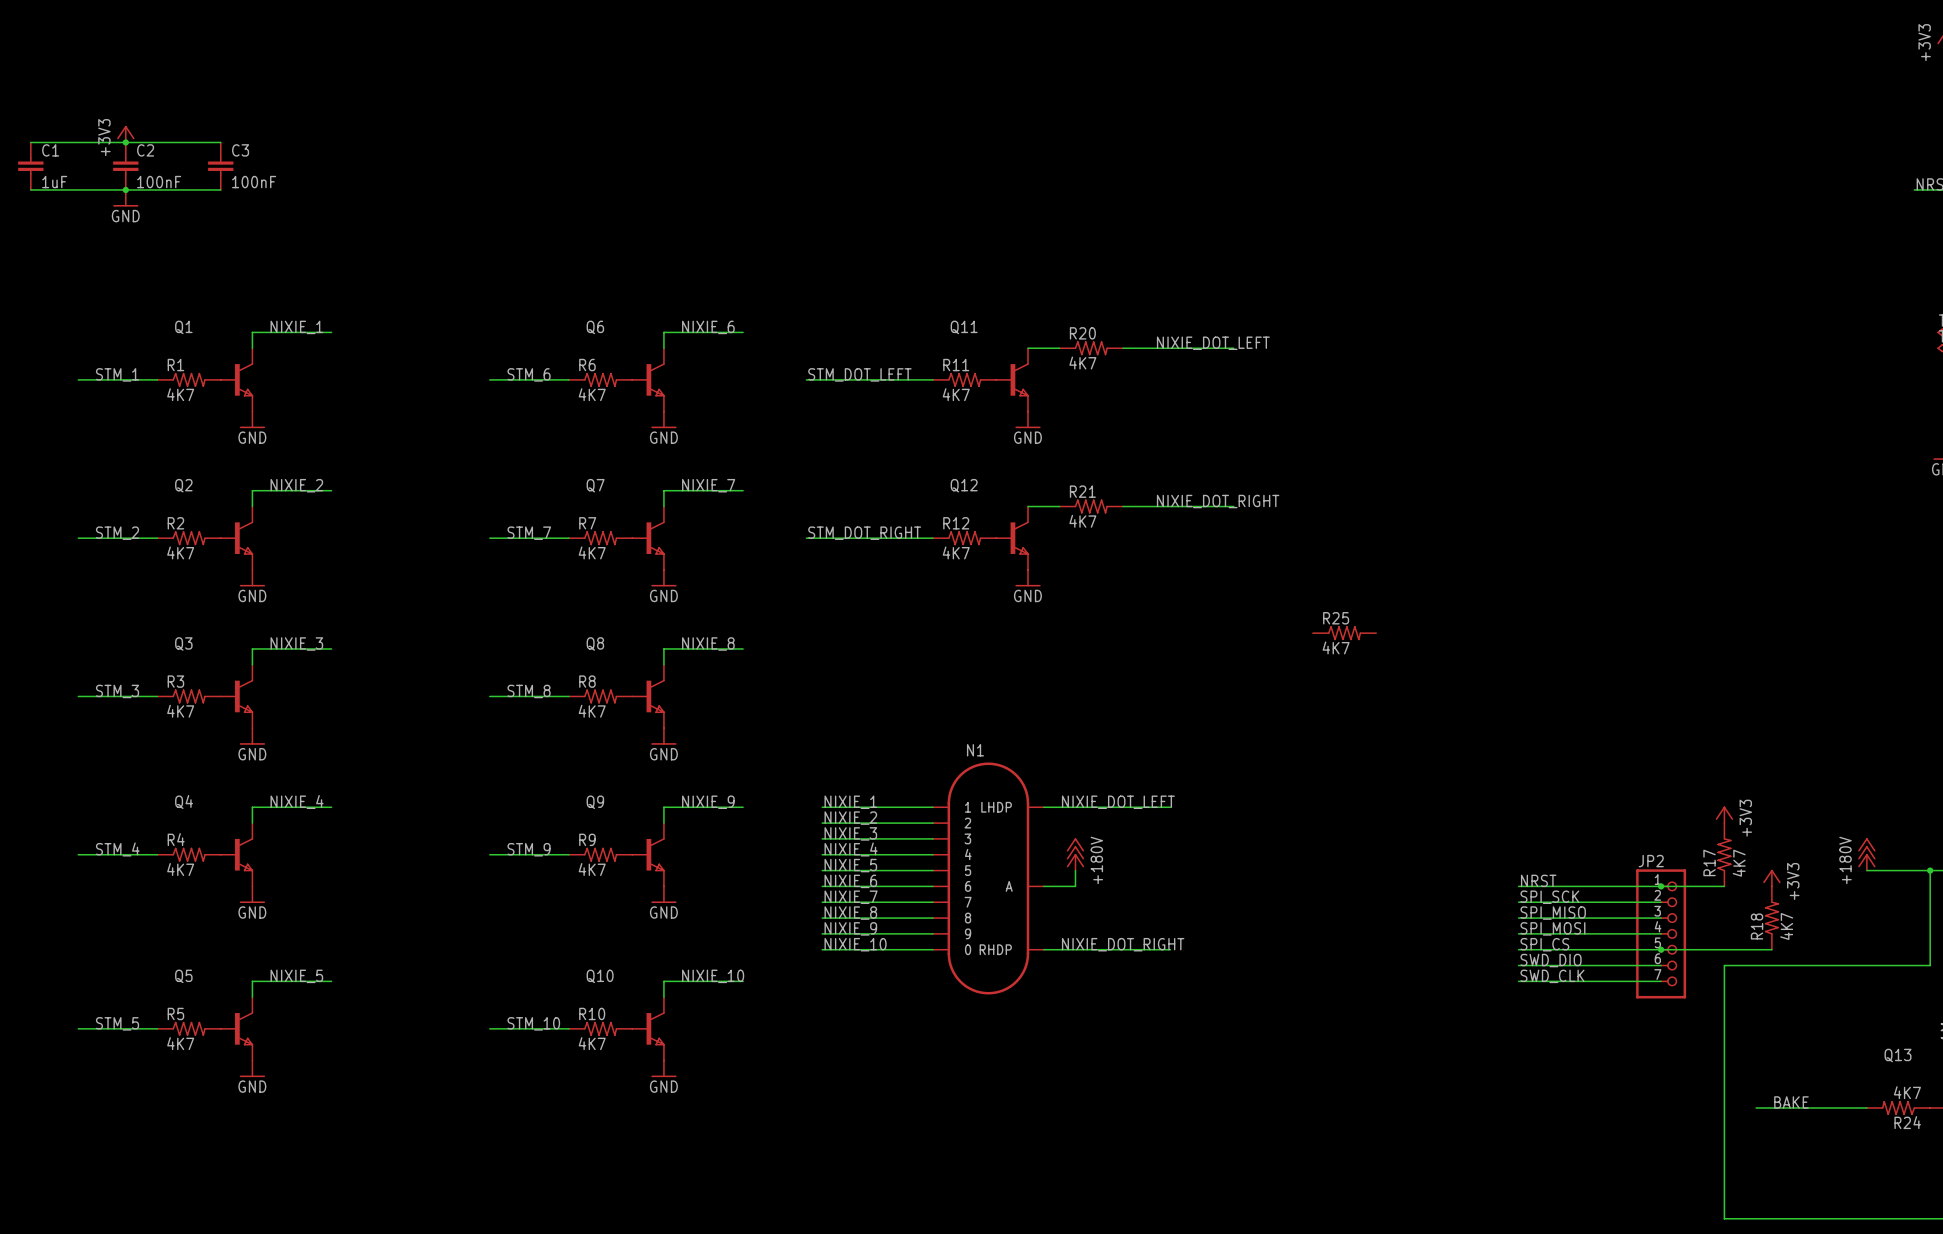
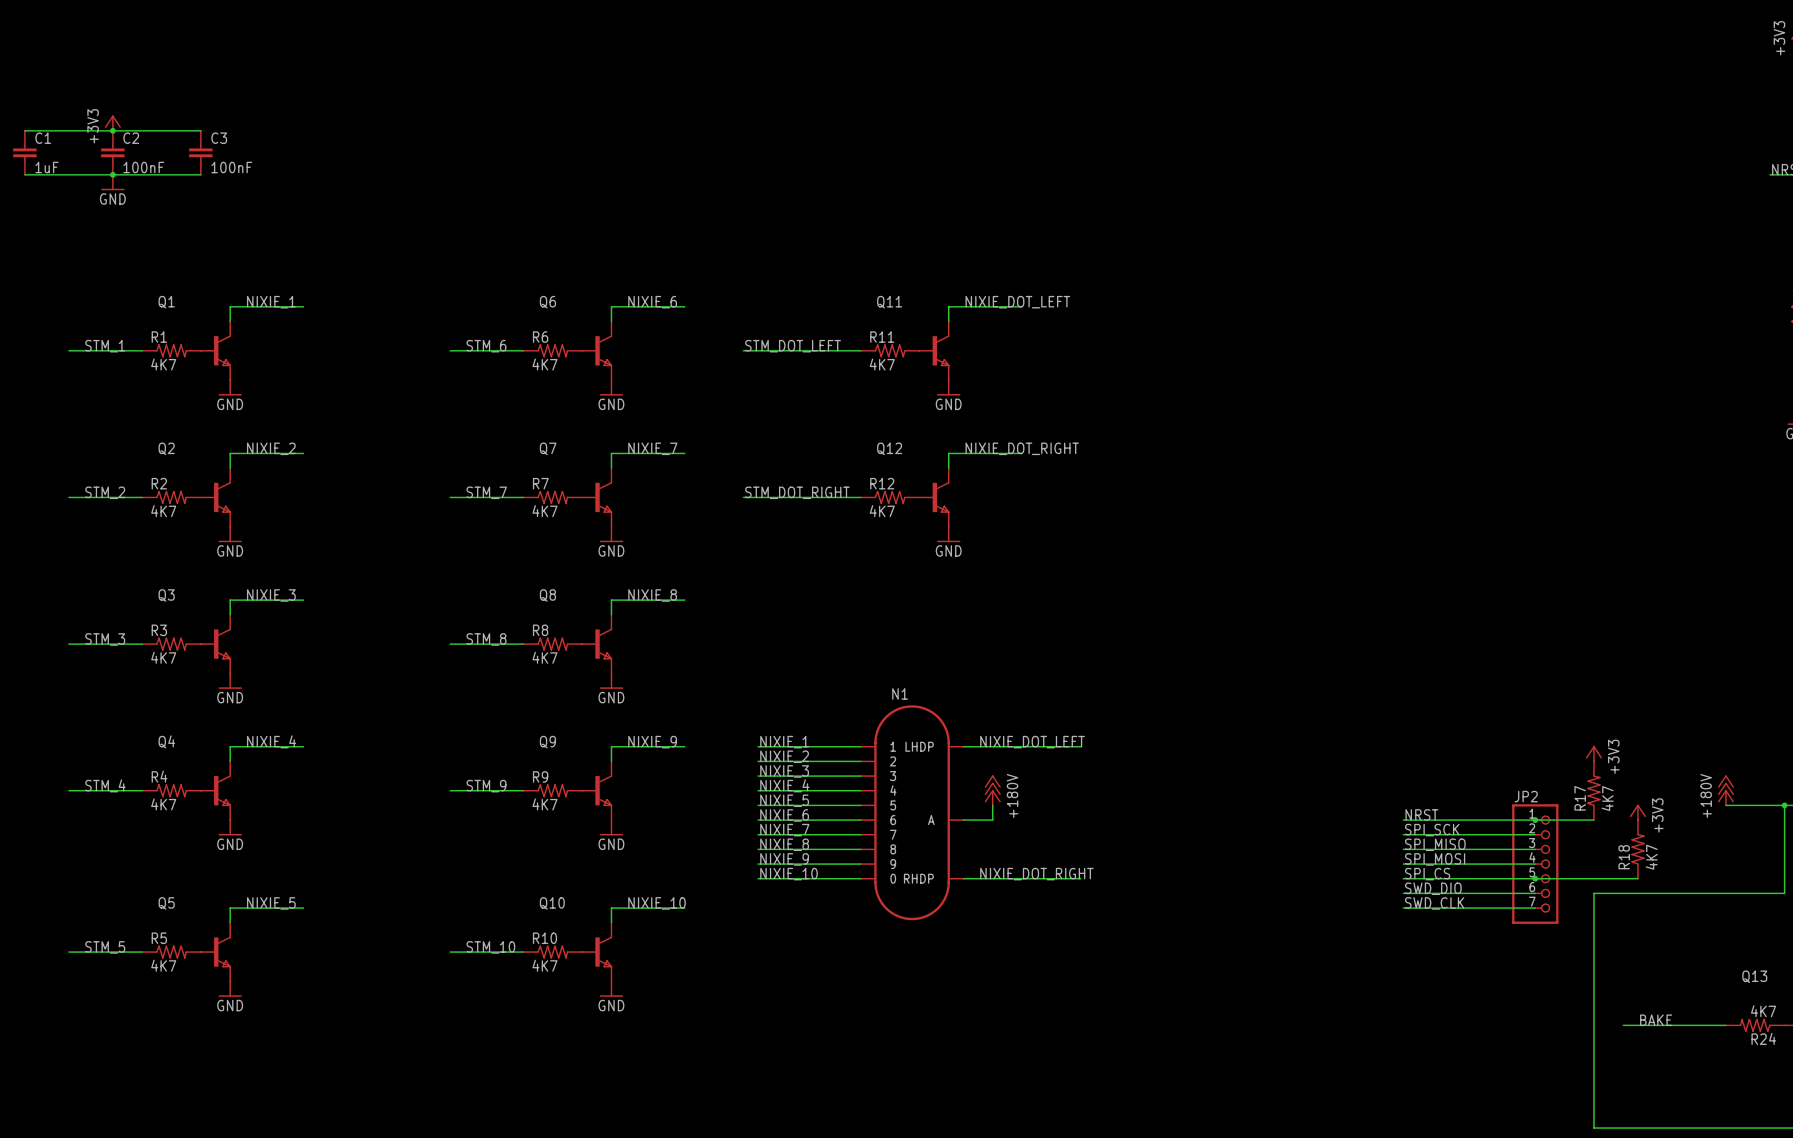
label position: NIXIE_DOT_LEFT (1213, 343) -> NIXIE_DOT_LEFT (1017, 302)
wire: (1027, 348) (1059, 348) -> (948, 321) (948, 306) (1022, 306)
R20: 4K7 (1091, 348) -> none
wire: (1122, 348) (1233, 348) -> none
label position: NIXIE_DOT_RIGHT (1218, 501) -> NIXIE_DOT_RIGHT (1022, 448)
wire: (1027, 506) (1059, 506) -> (948, 468) (948, 453) (1022, 453)
R21: 4K7 (1091, 506) -> none
wire: (1122, 506) (1233, 506) -> none
R25: 4K7 (1344, 633) -> none

